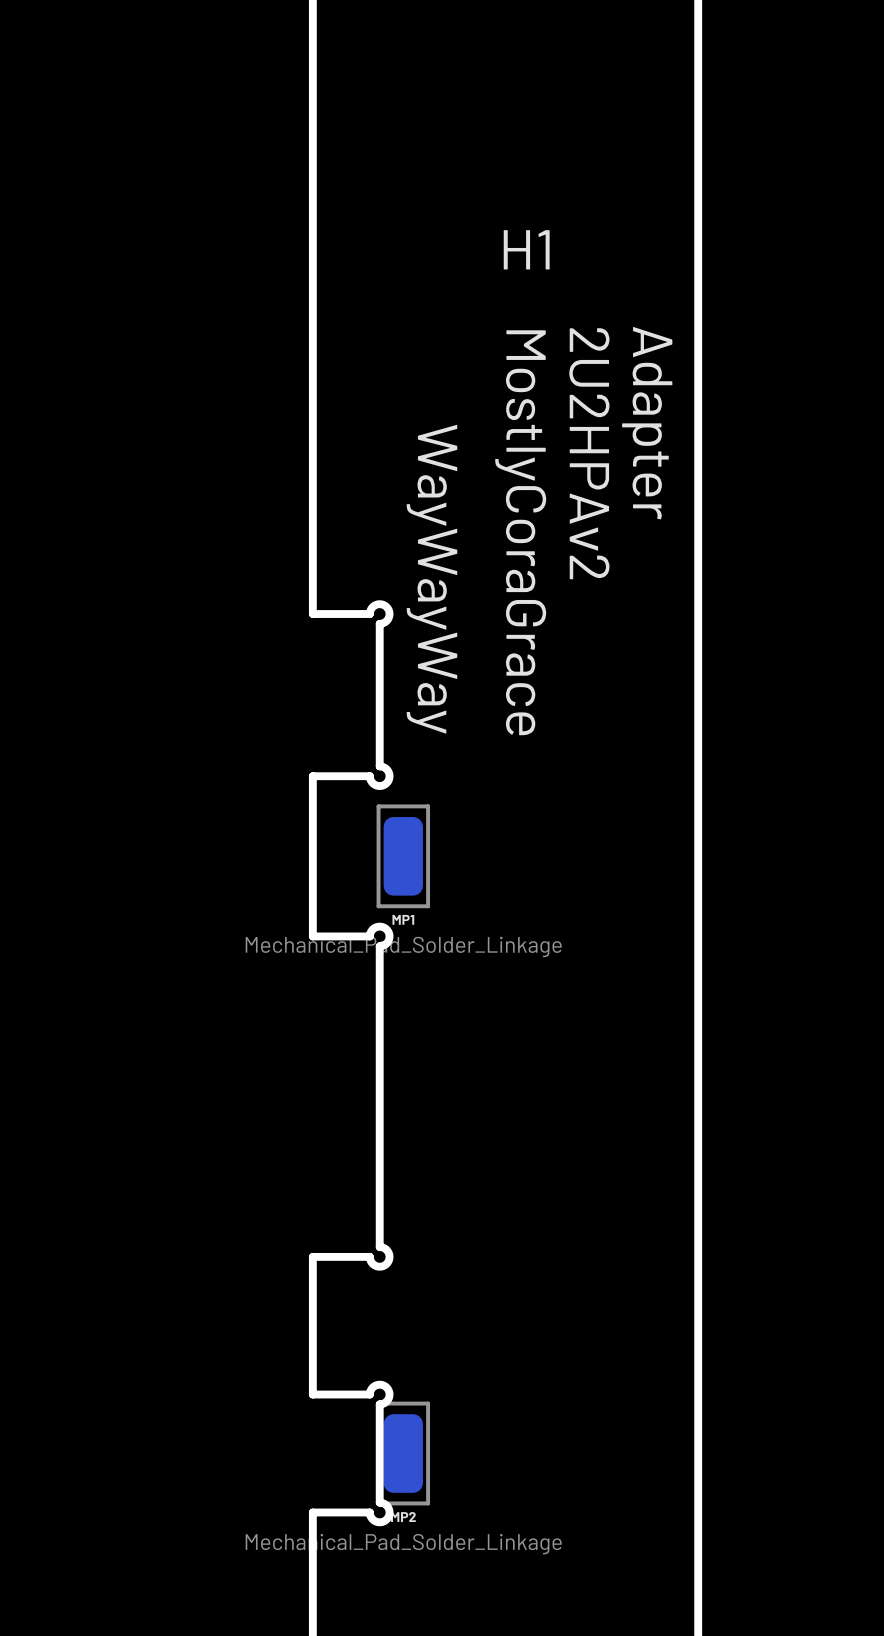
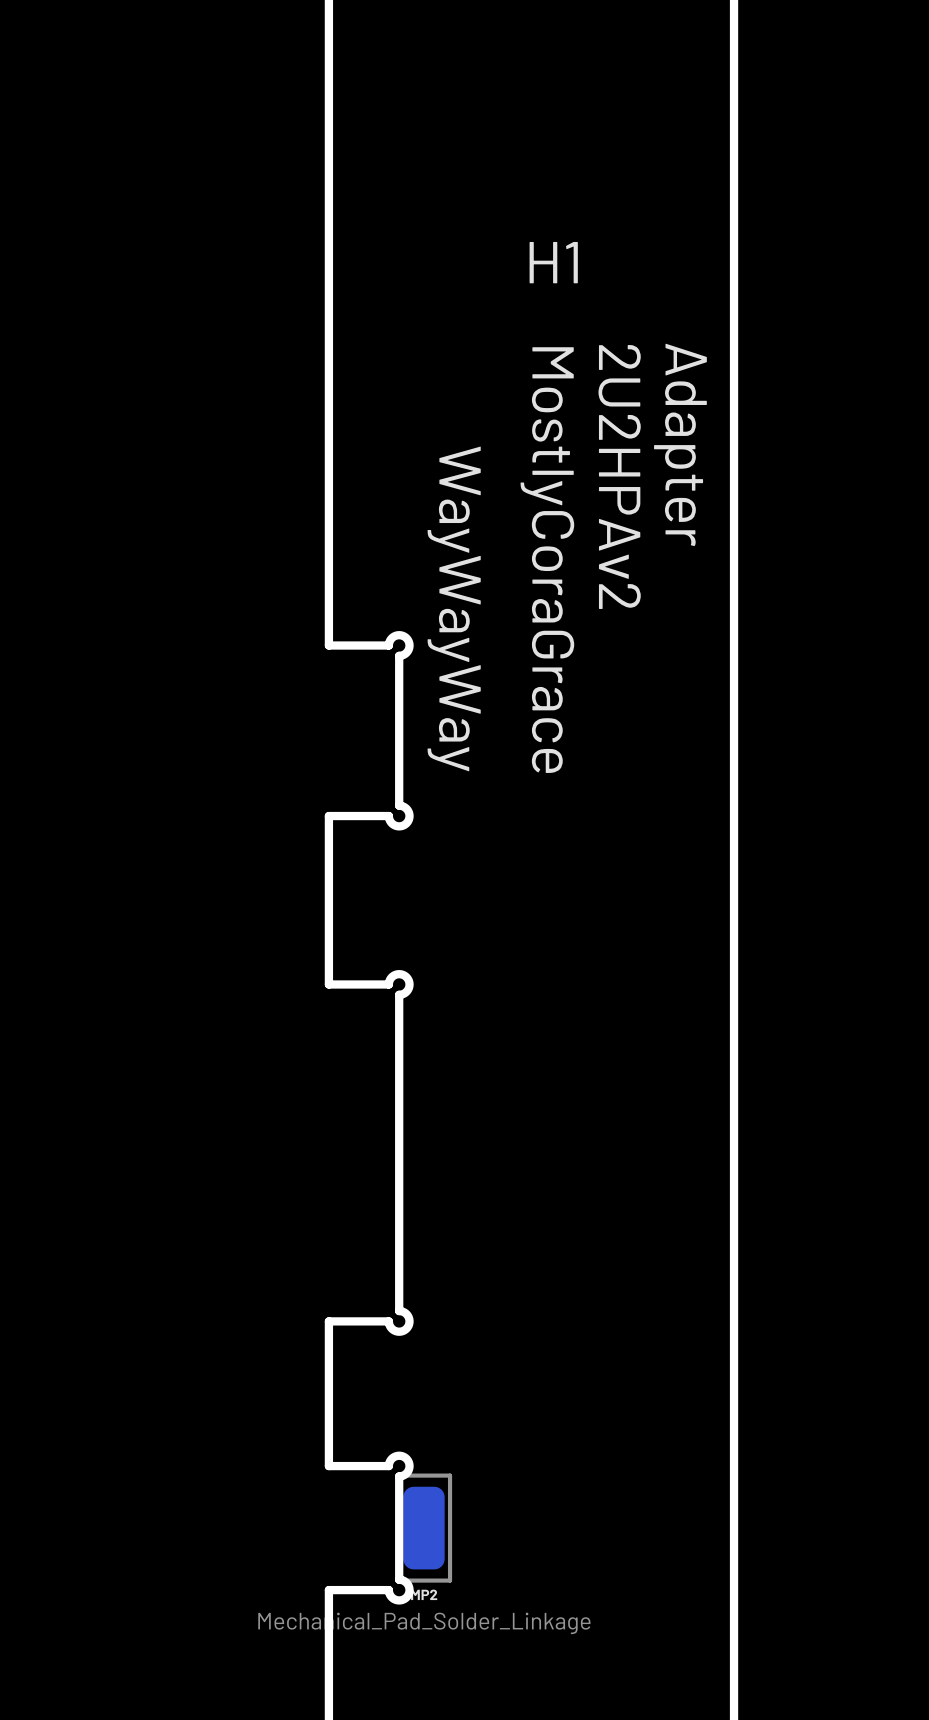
MP1: Mechanical_Pad_Solder_Linkage (403, 856) -> none

